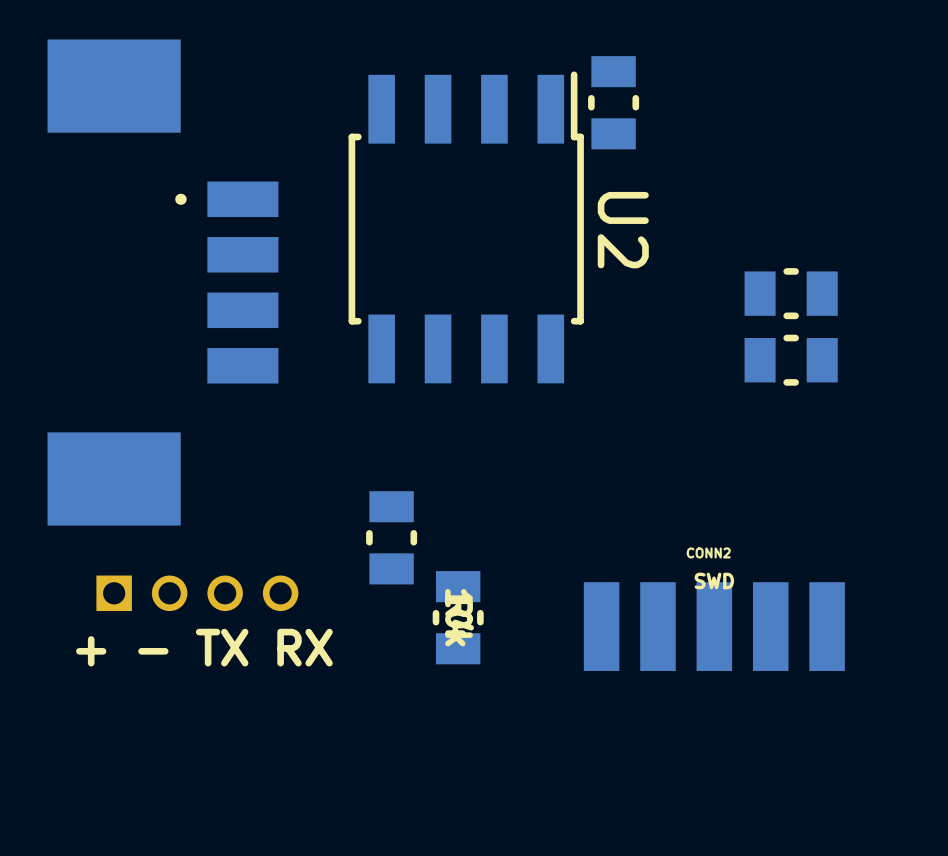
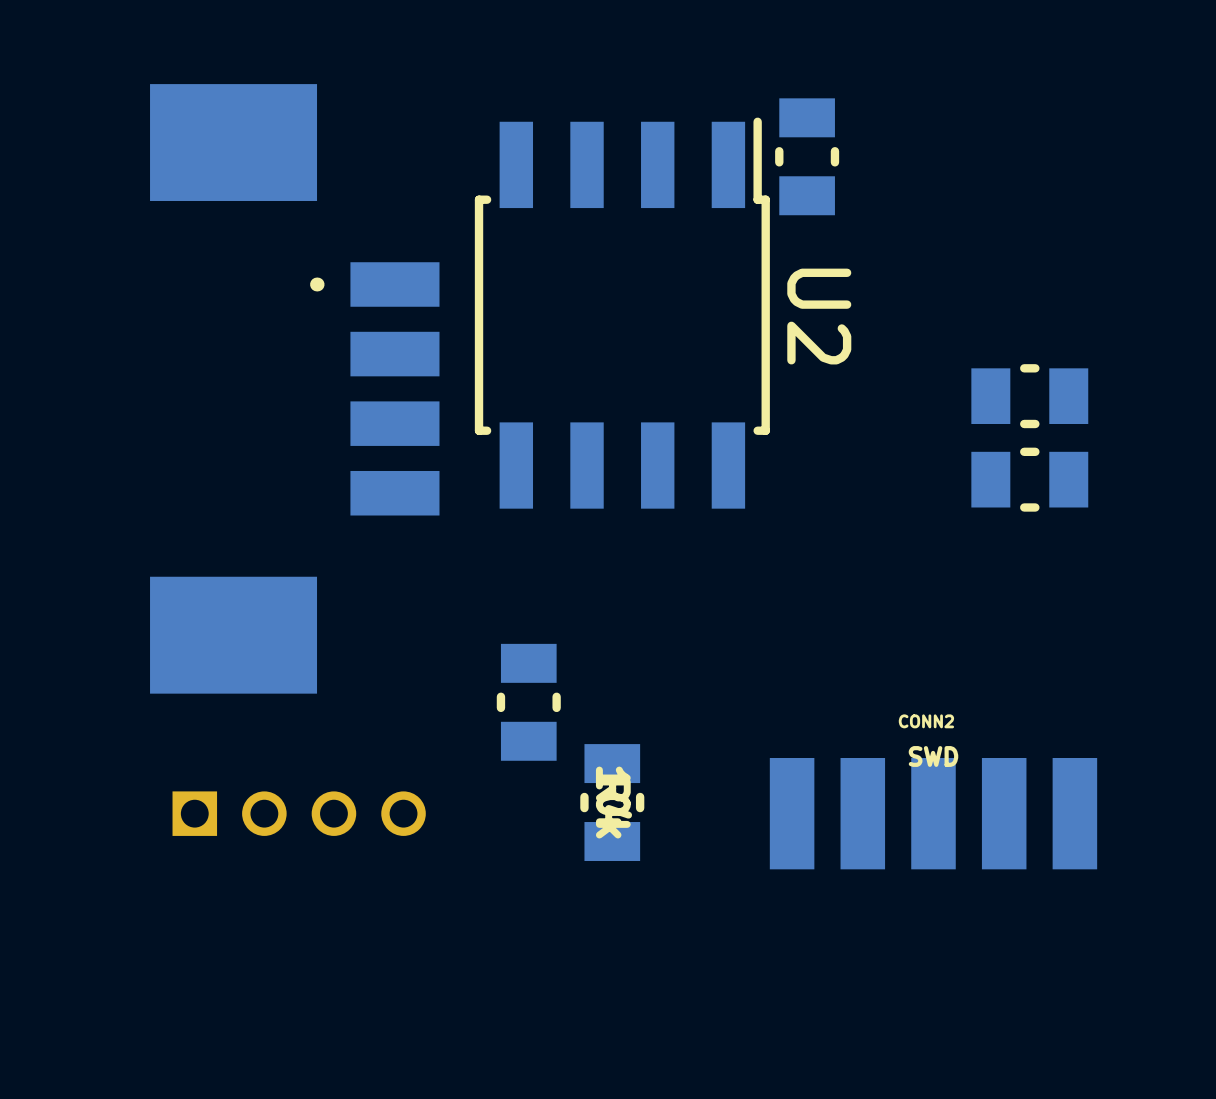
part position: (162, 282) -> (294, 388)
part position: (197, 593) -> (299, 813)
text: + - TX RX (204, 647) -> none

